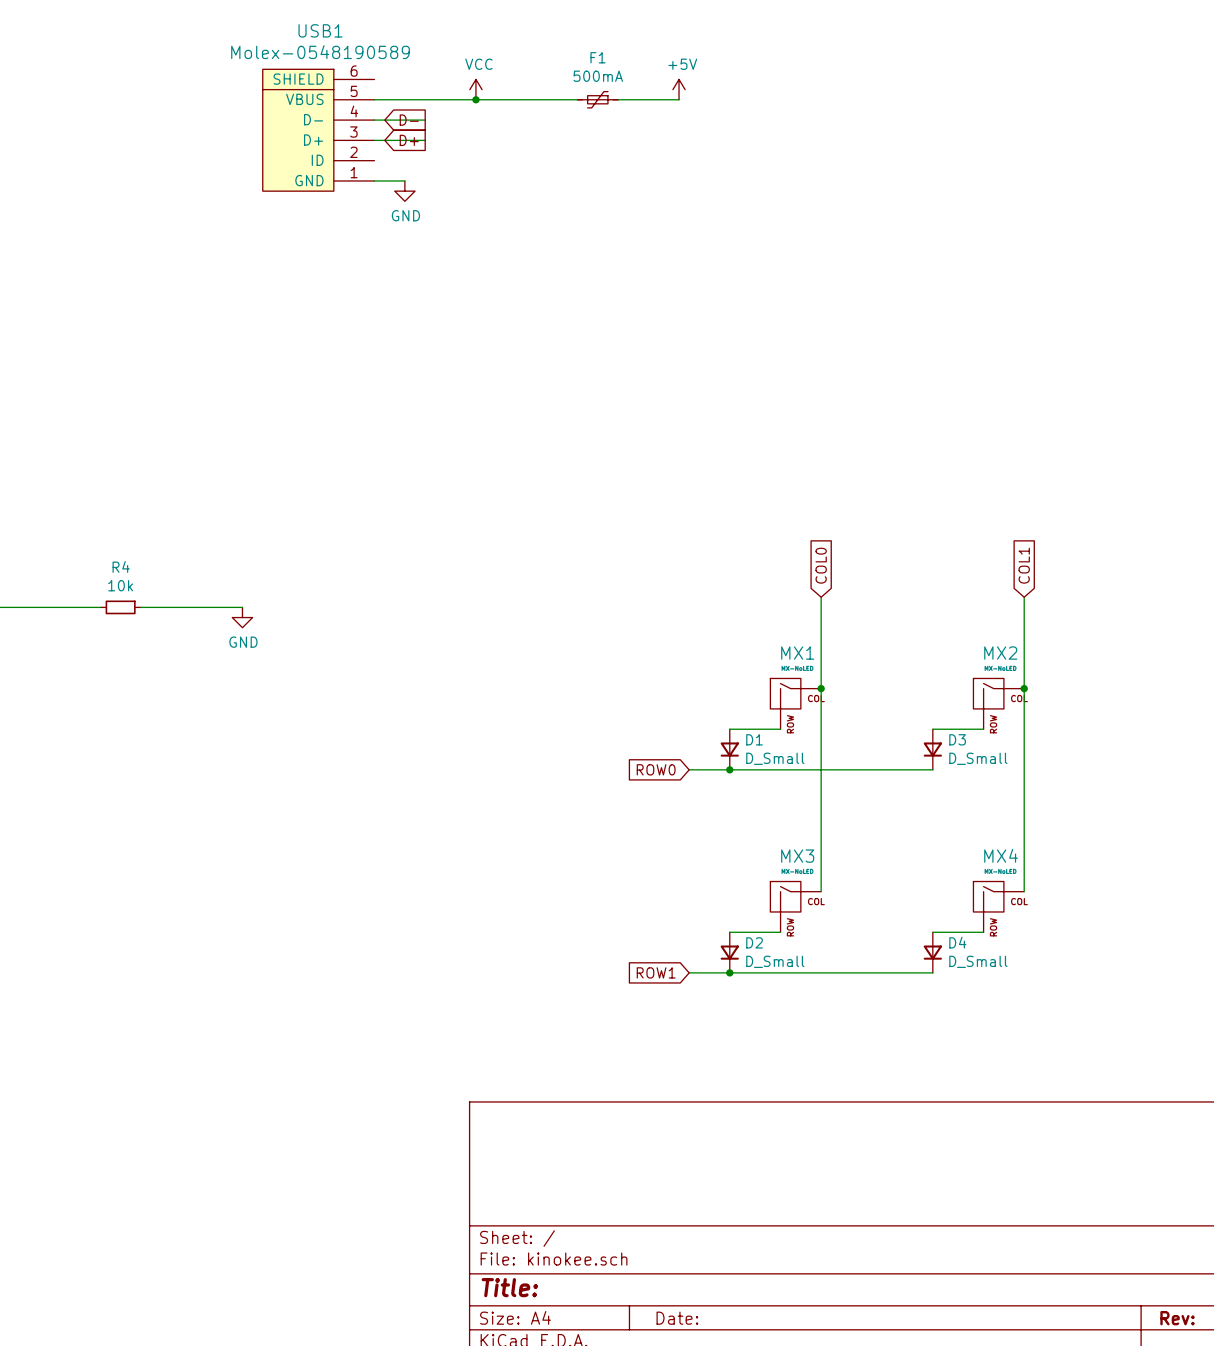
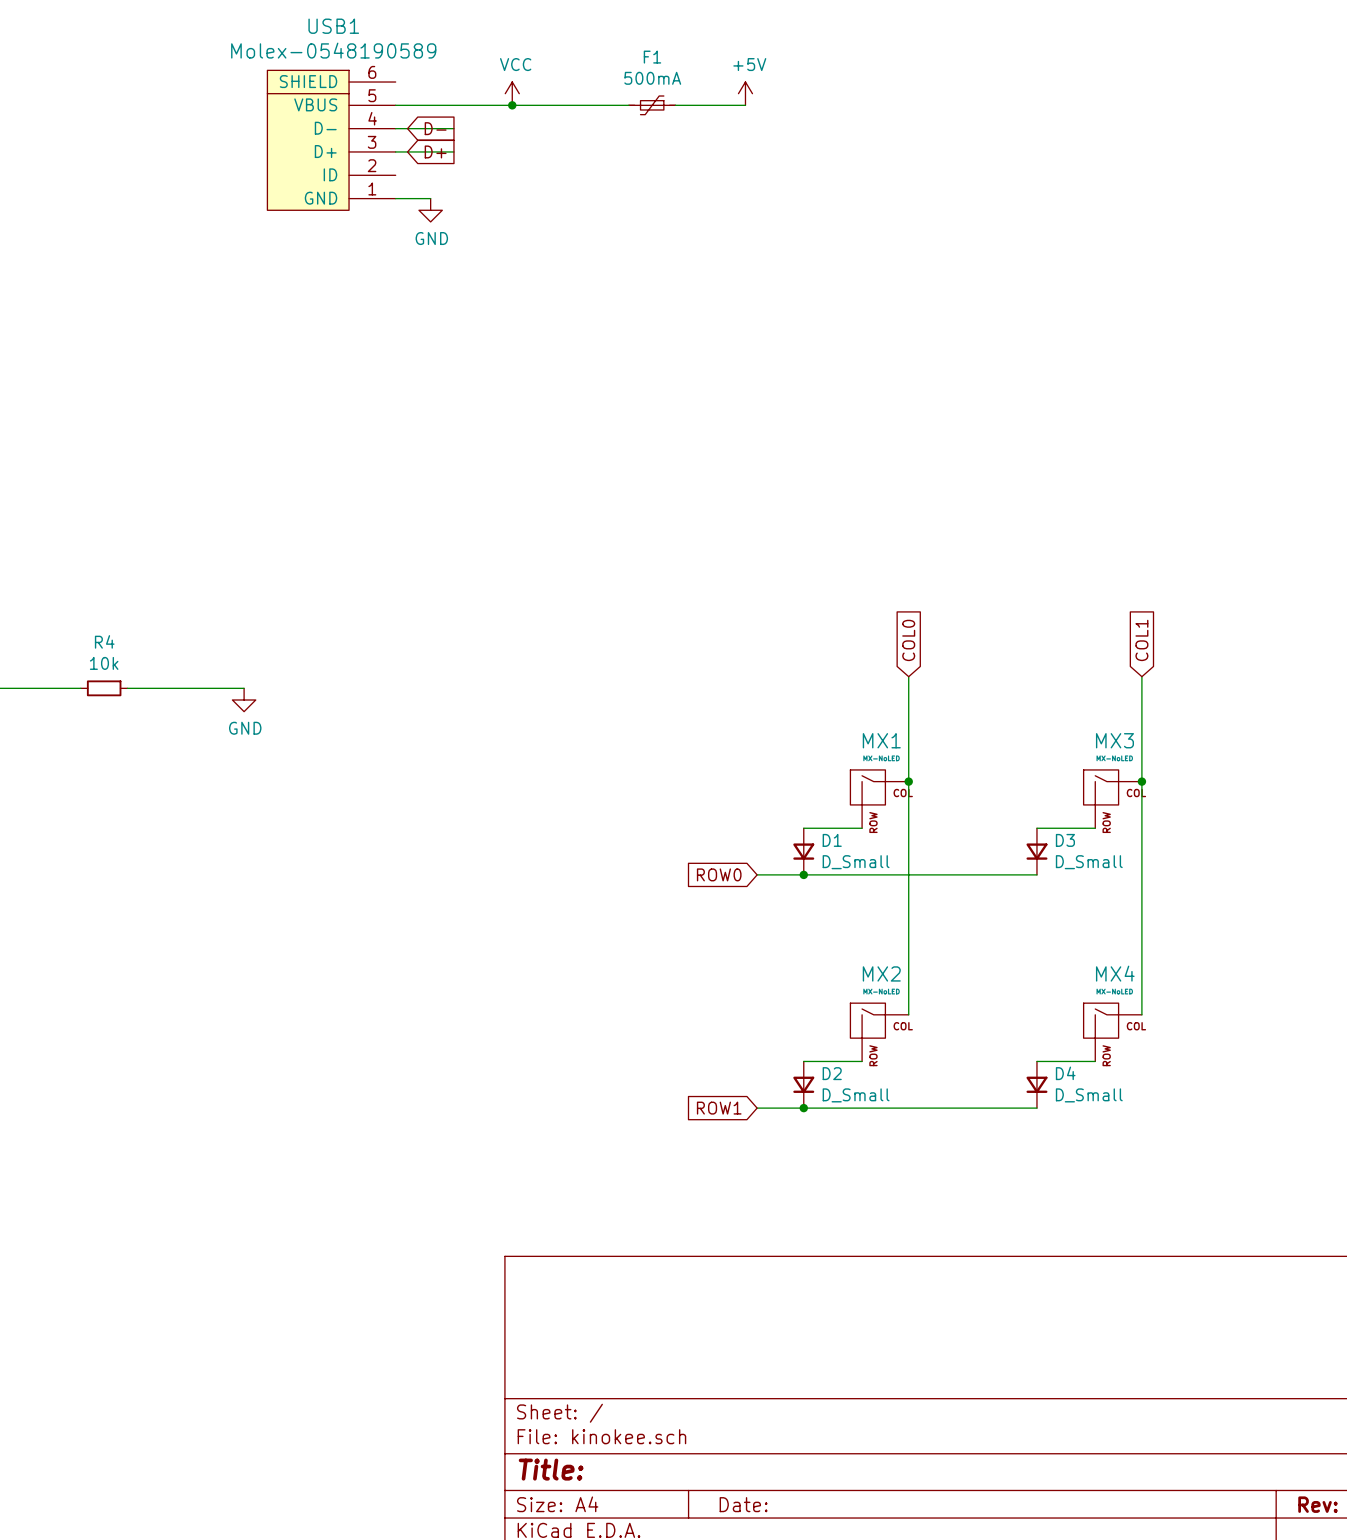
MX2 name: MX2 (1000, 653) -> MX3 (1114, 740)
MX3 name: MX3 (797, 856) -> MX2 (881, 973)

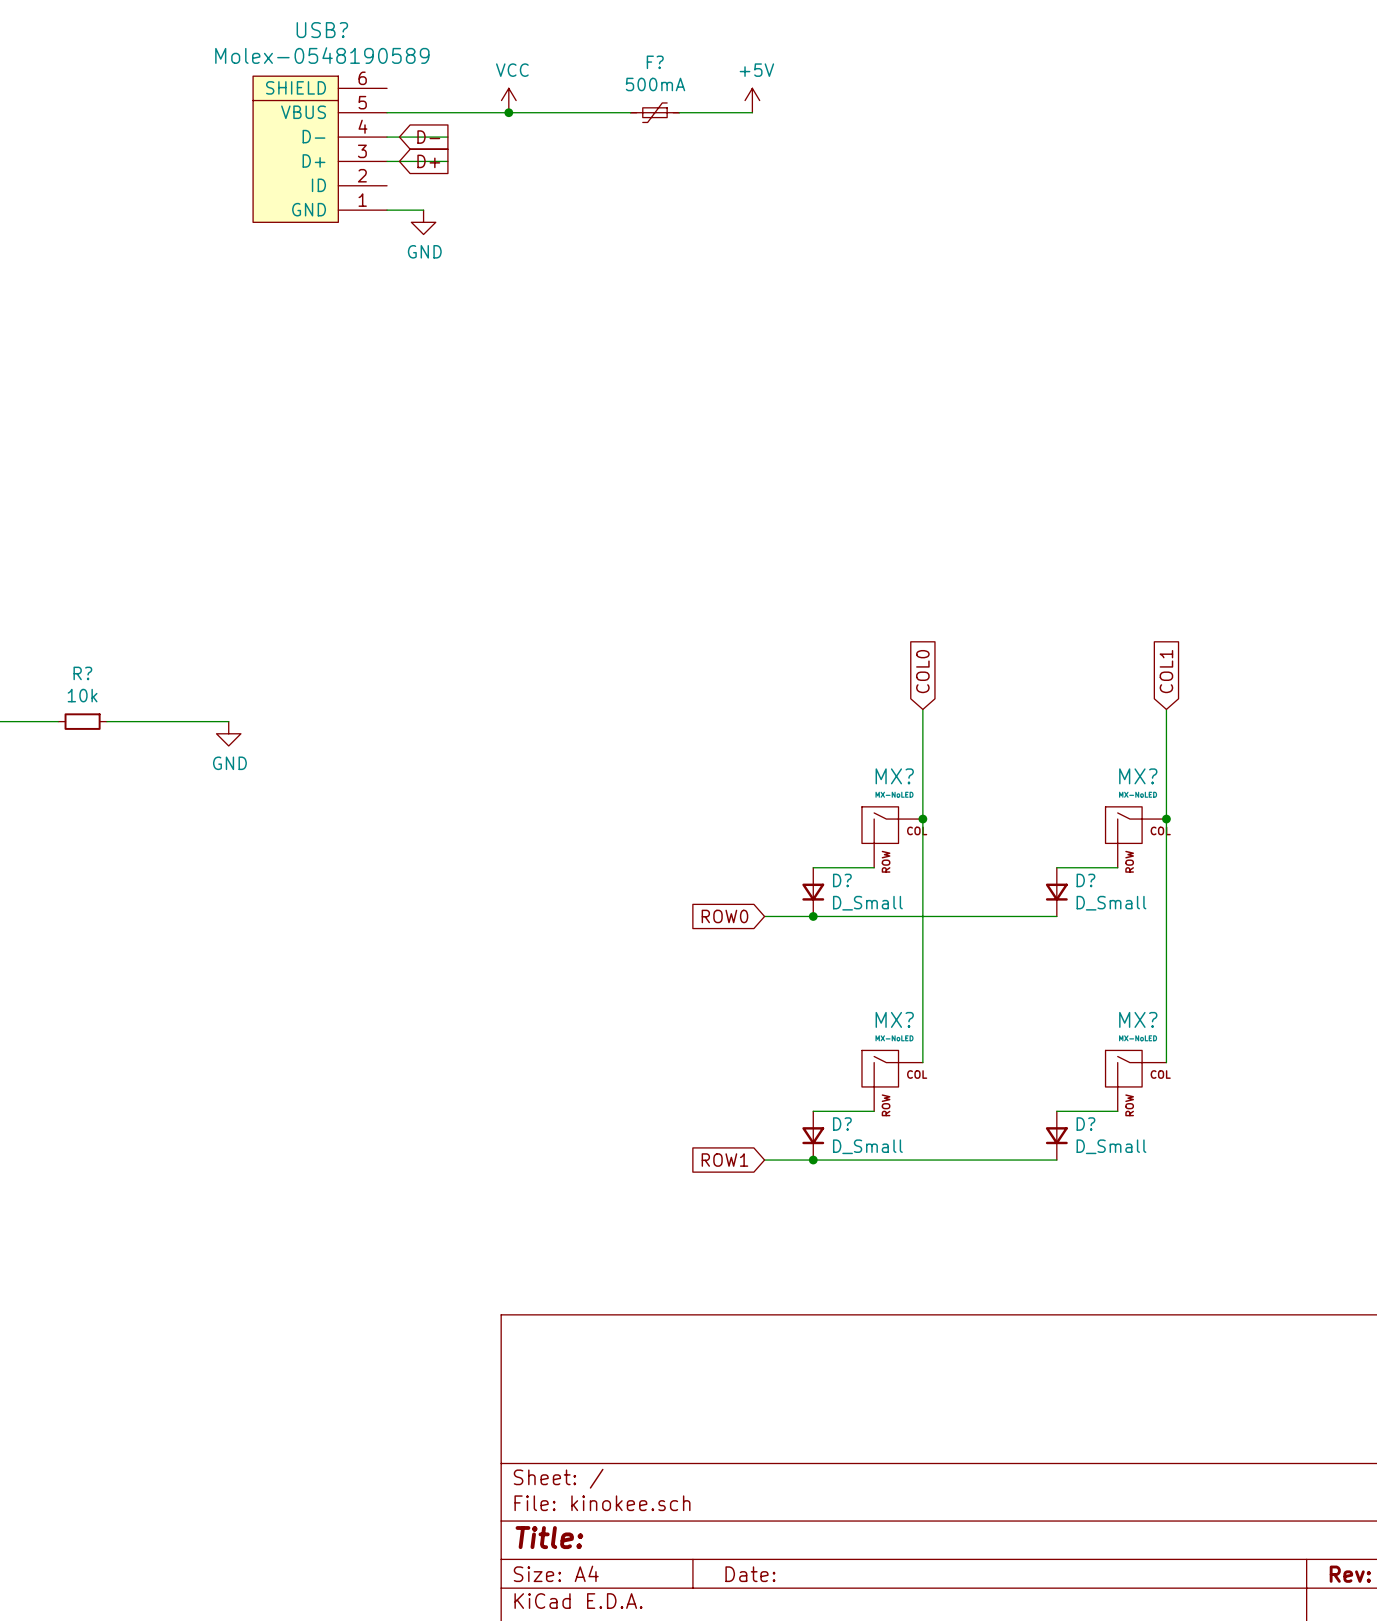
USB1 name: USB1 (333, 26) -> USB? (322, 30)
F1 name: F1 (652, 57) -> F? (655, 62)
R4 name: R4 (104, 641) -> R? (82, 673)
MX1 name: MX1 (881, 740) -> MX? (894, 776)
MX3 name: MX3 (1114, 740) -> MX? (1138, 776)
D1 name: D1 (832, 840) -> D? (842, 880)
D3 name: D3 (1065, 840) -> D? (1085, 880)
MX2 name: MX2 (881, 973) -> MX? (894, 1019)
MX4 name: MX4 (1115, 973) -> MX? (1138, 1019)
D2 name: D2 (832, 1073) -> D? (842, 1124)
D4 name: D4 (1065, 1073) -> D? (1085, 1124)

